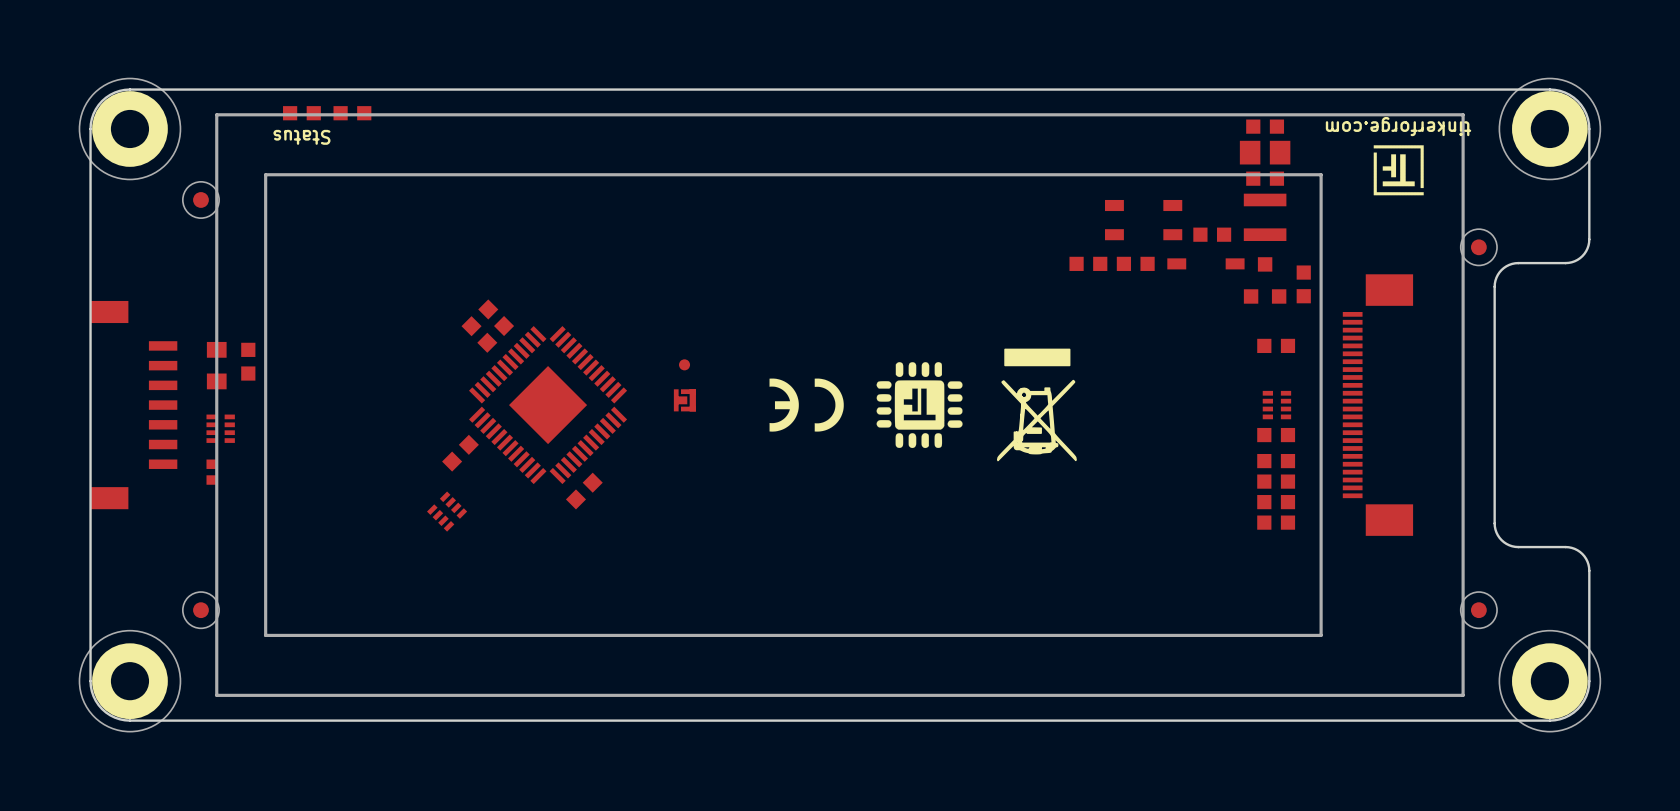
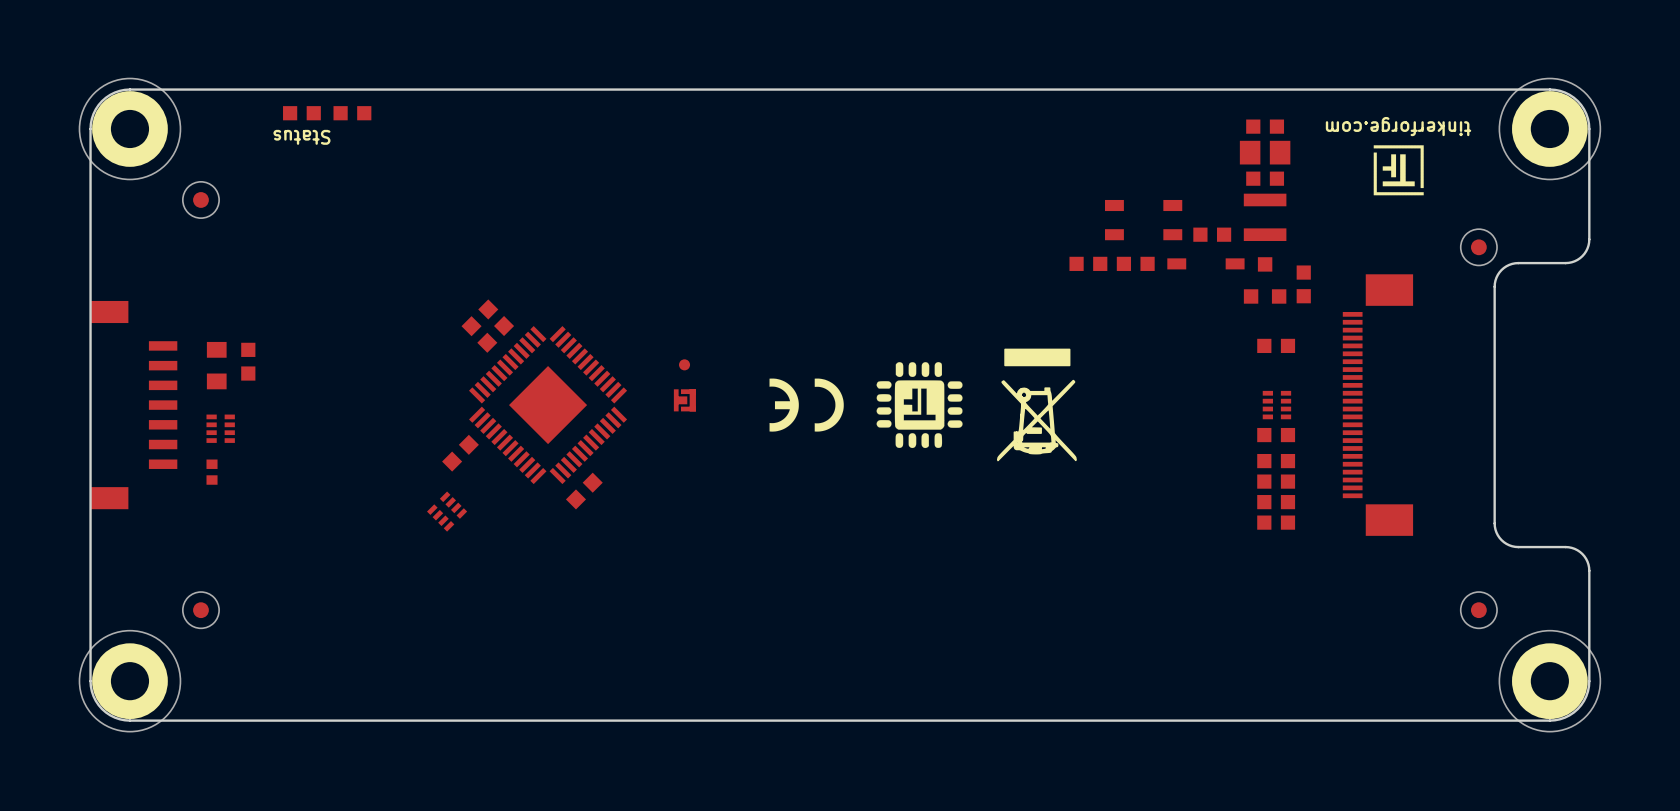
line: (216, 114) (216, 695) (1463, 695) (1463, 114) (216, 114) -> none
line: (265, 174) (1321, 174) (1321, 635) (265, 635) (265, 174) -> none

